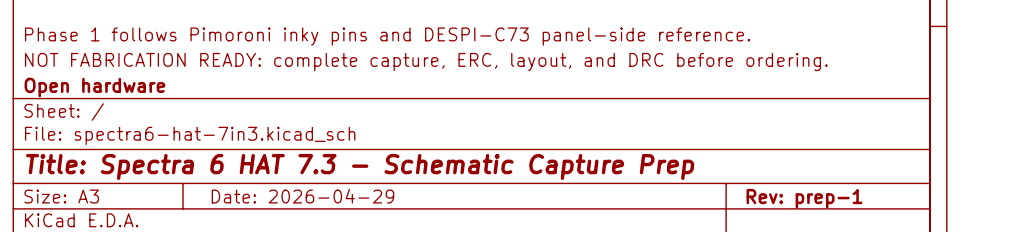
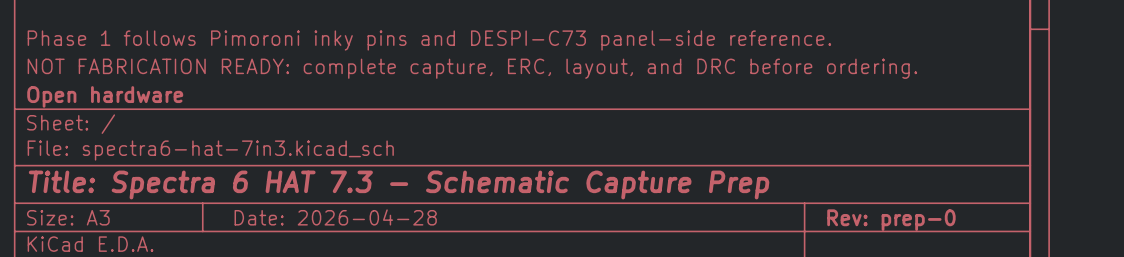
title block: Date: 2026-04-29 (302, 196) -> Date: 2026-04-28 (335, 217)
title block: Rev: prep-1 (804, 198) -> Rev: prep-0 (891, 220)

